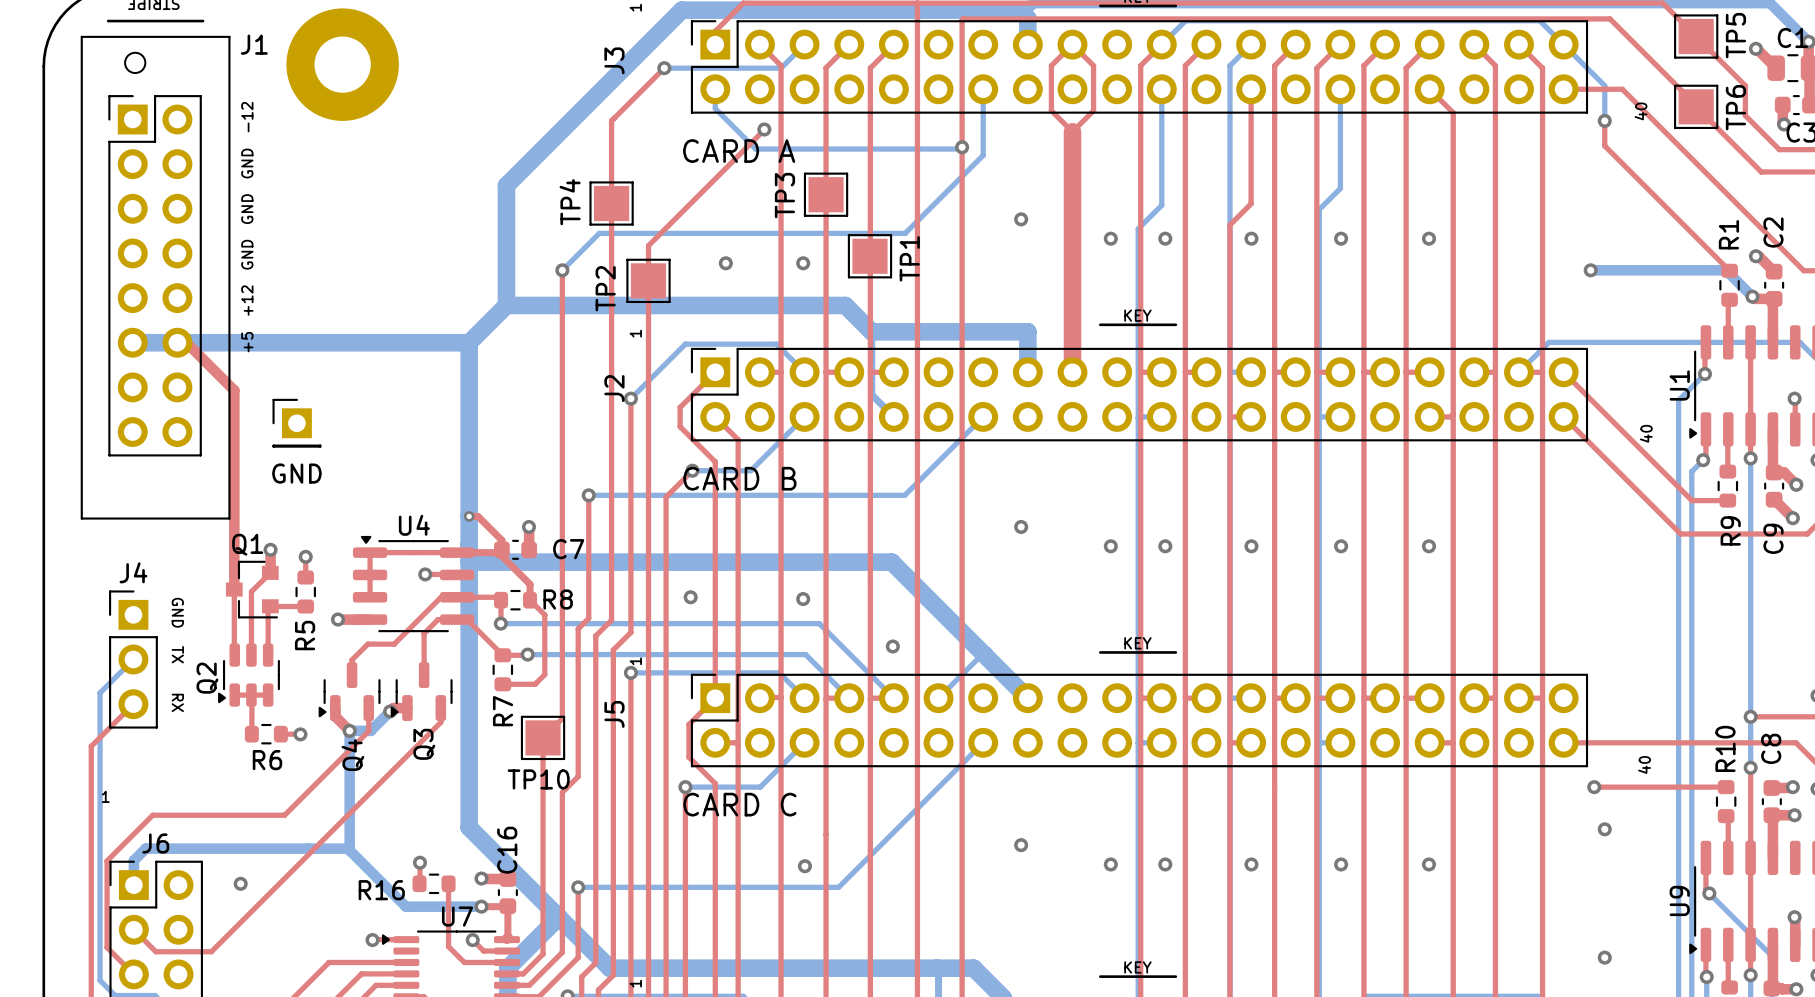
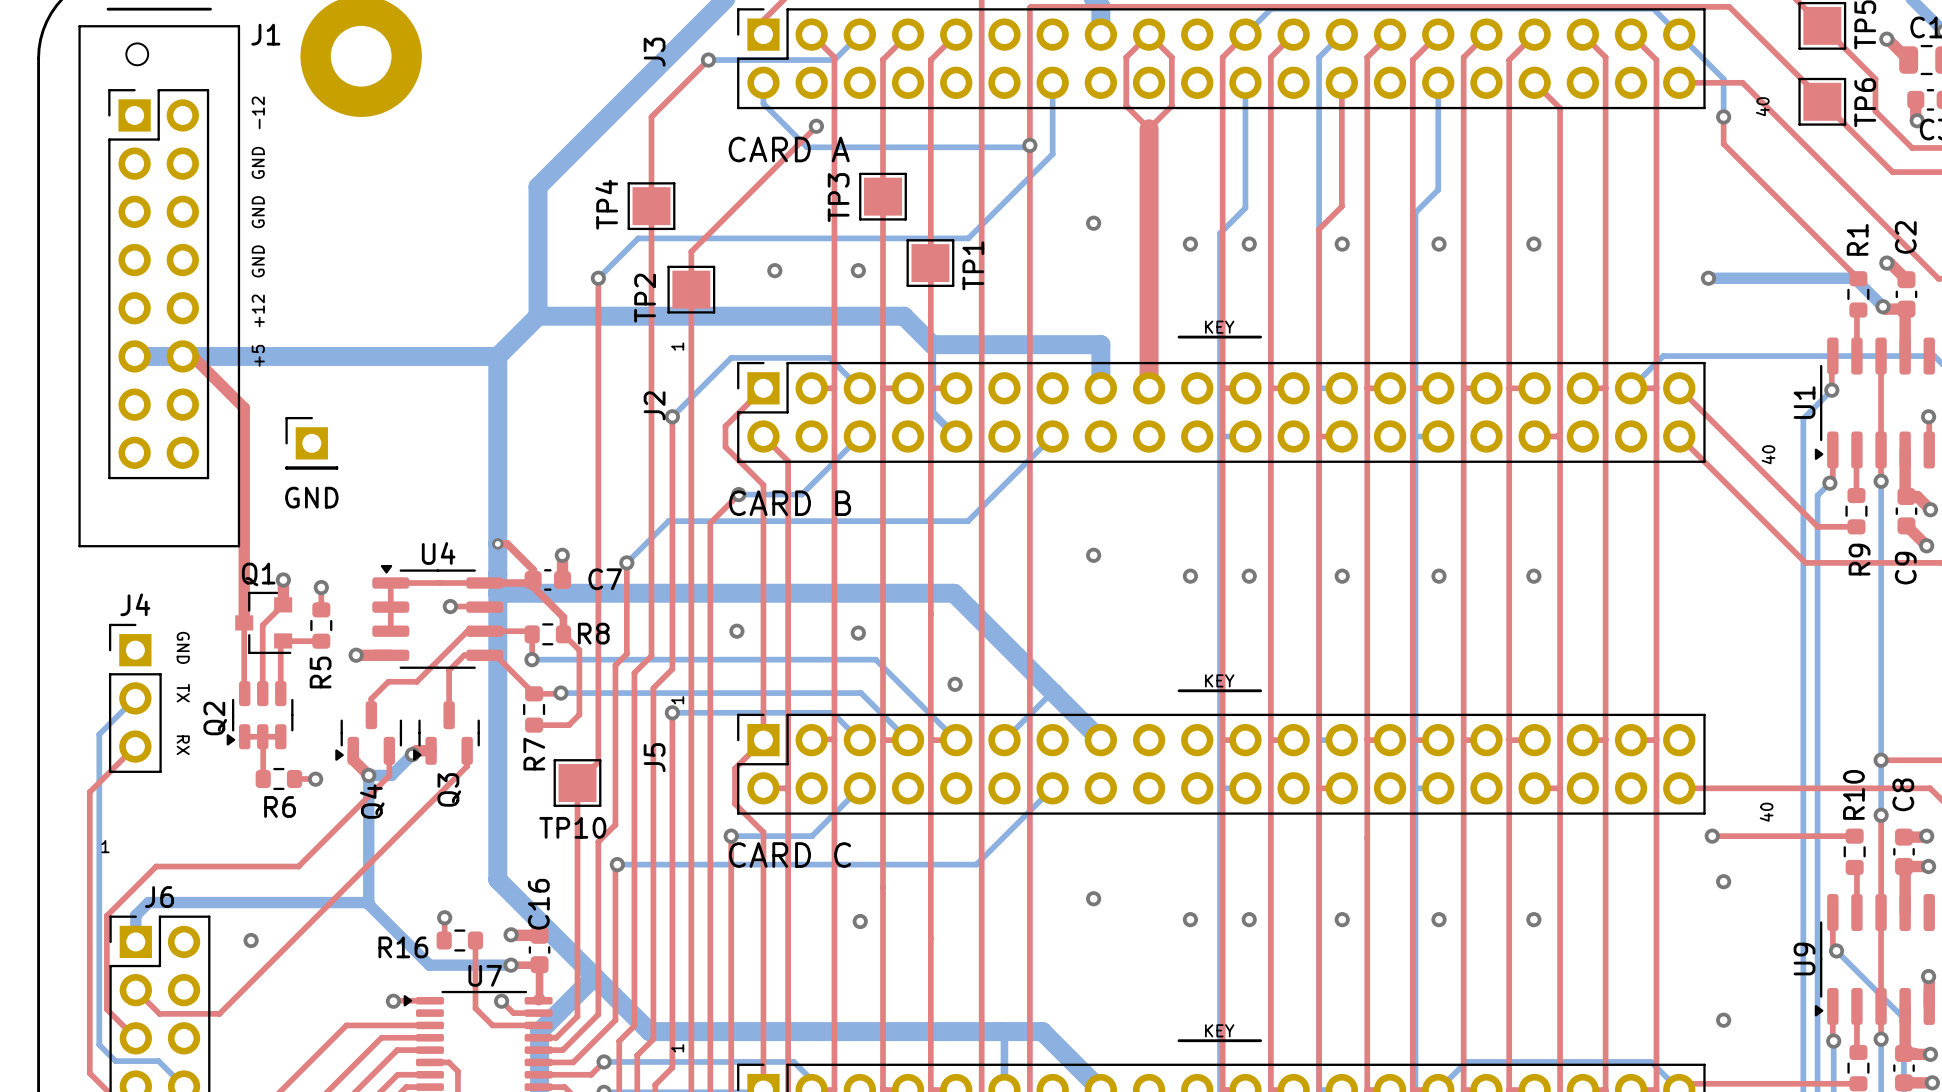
top track: (588, 495) (588, 533) -> none
bottom track: (588, 495) (627, 495) -> (626, 562) (668, 521)
via position: (588, 495) -> (626, 562)
top track: none -> (617, 864) (615, 866) (615, 944)
bottom track: (912, 813) (838, 887) (578, 887) -> (976, 864) (617, 864)
via position: (578, 887) -> (617, 864)

